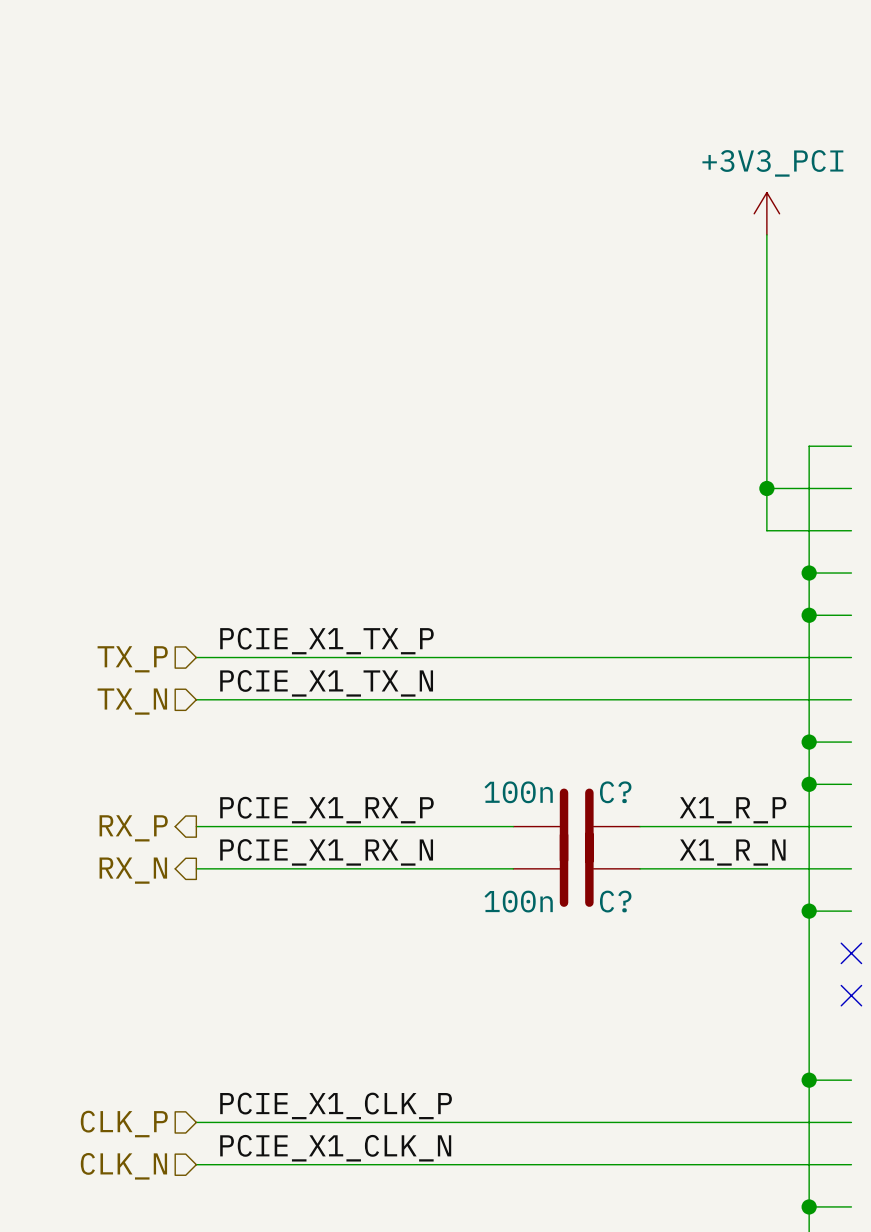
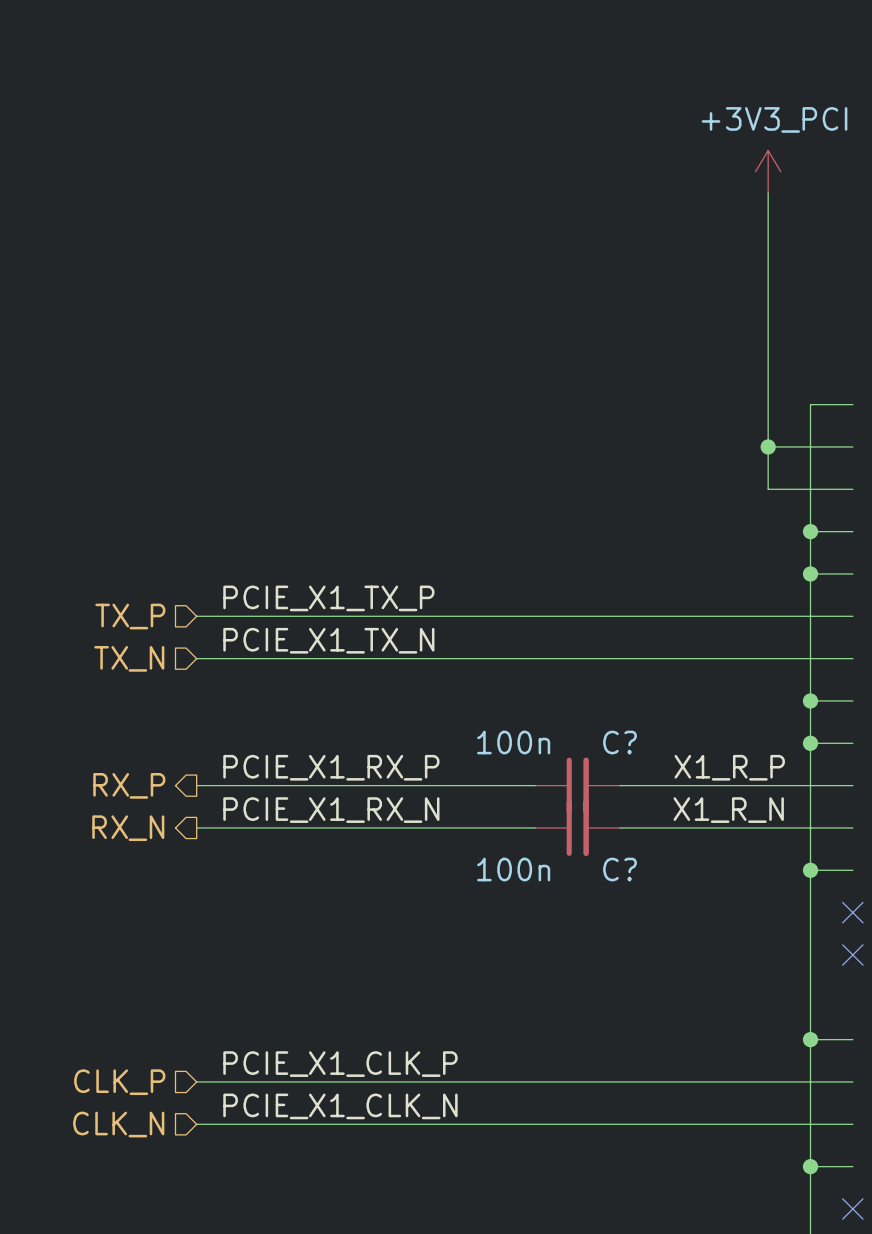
power symbol position: +3V3_PCI (766, 213) -> +3V3_PCI (768, 171)
wire: none -> (852, 404) (810, 404) (810, 446) (768, 446)
junction: none -> (768, 446)
wire: (766, 488) (766, 530) (809, 530) -> none
junction: (766, 488) -> none
junction: none -> (810, 531)
label: none -> PCIE_X1_TX_P (328, 598)
junction: (809, 615) -> none
hierarchical label: none -> TX_P (130, 616)
label: PCIE_X1_TX_P (326, 641) -> PCIE_X1_TX_N (328, 640)
hierarchical label: TX_P (132, 659) -> TX_N (129, 658)
label: PCIE_X1_TX_N (326, 683) -> none
wire: (196, 699) (809, 699) -> (196, 616) (810, 616)
junction: none -> (810, 700)
hierarchical label: TX_N (132, 701) -> none
label: none -> PCIE_X1_RX_P (331, 767)
label: none -> X1_R_P (729, 767)
wire: none -> (196, 785) (535, 785)
C?: none -> 100n (577, 785)
wire: none -> (620, 785) (810, 785)
junction: (809, 784) -> none
hierarchical label: none -> RX_P (129, 785)
C? symbol: [513, 788, 641, 865] -> [535, 799, 621, 857]
C? value position: 100n (518, 792) -> 100n (513, 869)
C? name position: C? (615, 792) -> C? (620, 869)
label: PCIE_X1_RX_P (326, 810) -> PCIE_X1_RX_N (331, 810)
label: X1_R_P (733, 810) -> X1_R_N (728, 810)
hierarchical label: RX_P (133, 828) -> RX_N (128, 828)
label: PCIE_X1_RX_N (326, 852) -> none
label: X1_R_N (732, 852) -> none
wire: (196, 868) (513, 868) -> none
C?: 100n (576, 868) -> none
wire: (640, 868) (809, 868) -> none
junction: none -> (810, 870)
hierarchical label: RX_N (133, 870) -> none
wire: (809, 911) (851, 911) -> (810, 1039) (852, 1039)
junction: (809, 911) -> none
no-connect mark position: (851, 995) -> (852, 912)
junction: none -> (810, 1039)
label: none -> PCIE_X1_CLK_P (340, 1064)
junction: (809, 1080) -> none
hierarchical label: none -> CLK_P (119, 1082)
label: PCIE_X1_CLK_P (336, 1105) -> PCIE_X1_CLK_N (340, 1106)
hierarchical label: CLK_P (124, 1124) -> CLK_N (118, 1124)
label: PCIE_X1_CLK_N (335, 1148) -> none
wire: (196, 1164) (809, 1164) -> (196, 1081) (810, 1081)
junction: none -> (810, 1166)
hierarchical label: CLK_N (123, 1166) -> none
wire: (809, 1206) (851, 1206) -> none
junction: (809, 1206) -> none
no-connect mark: none -> (852, 1208)

